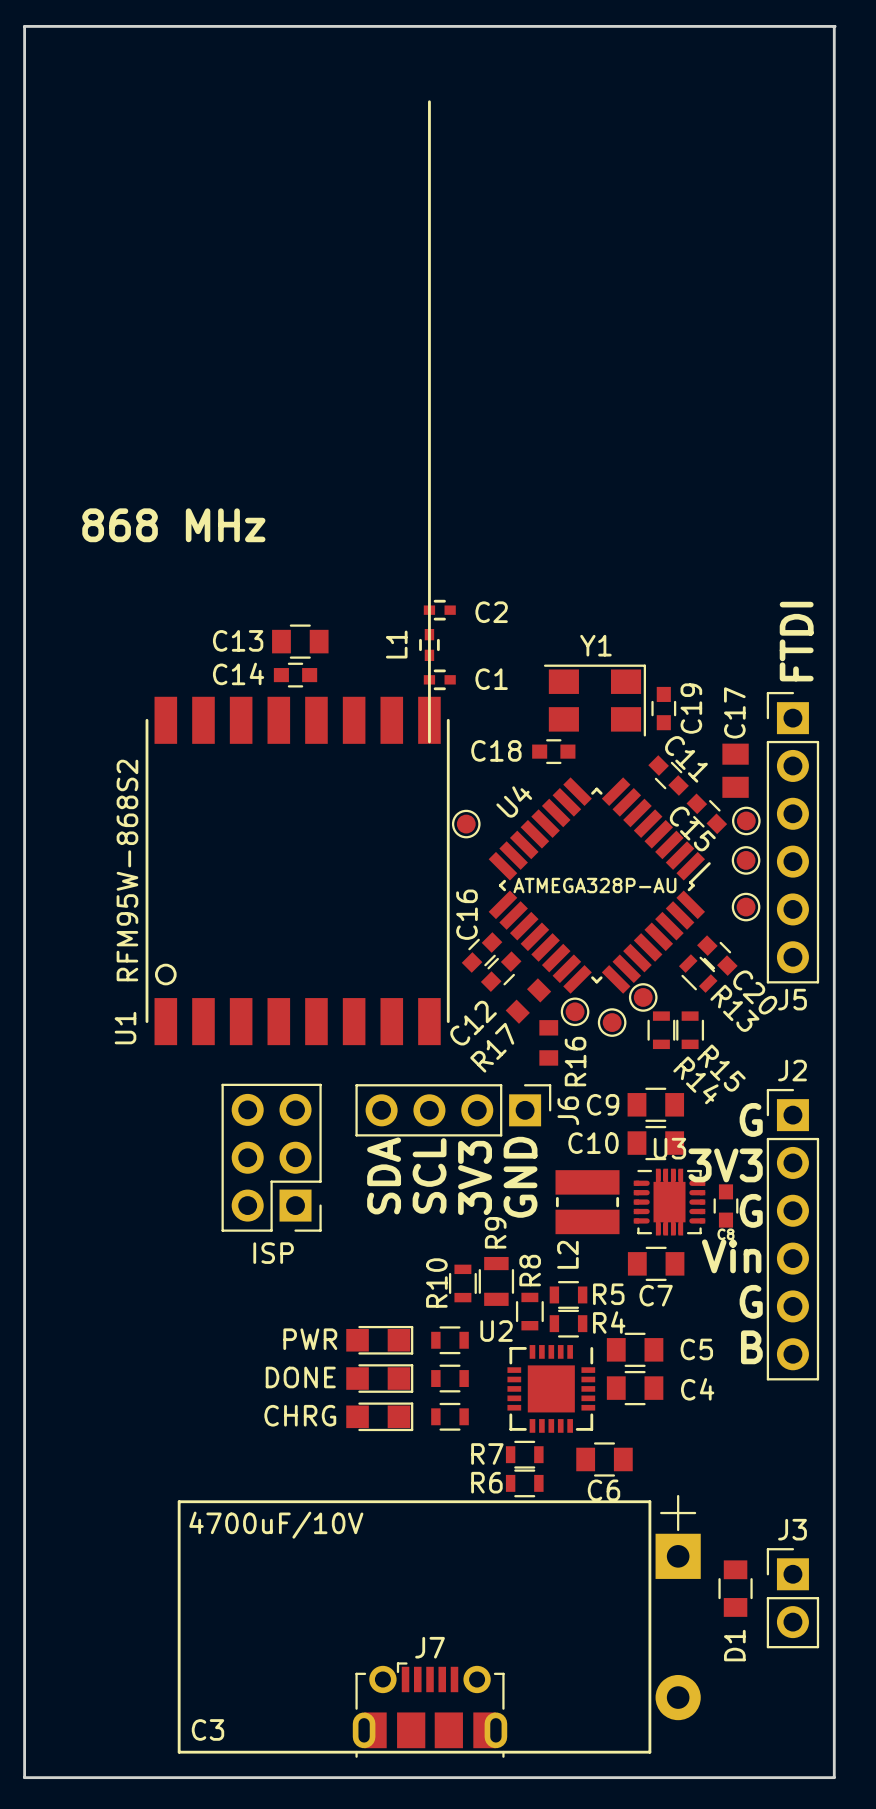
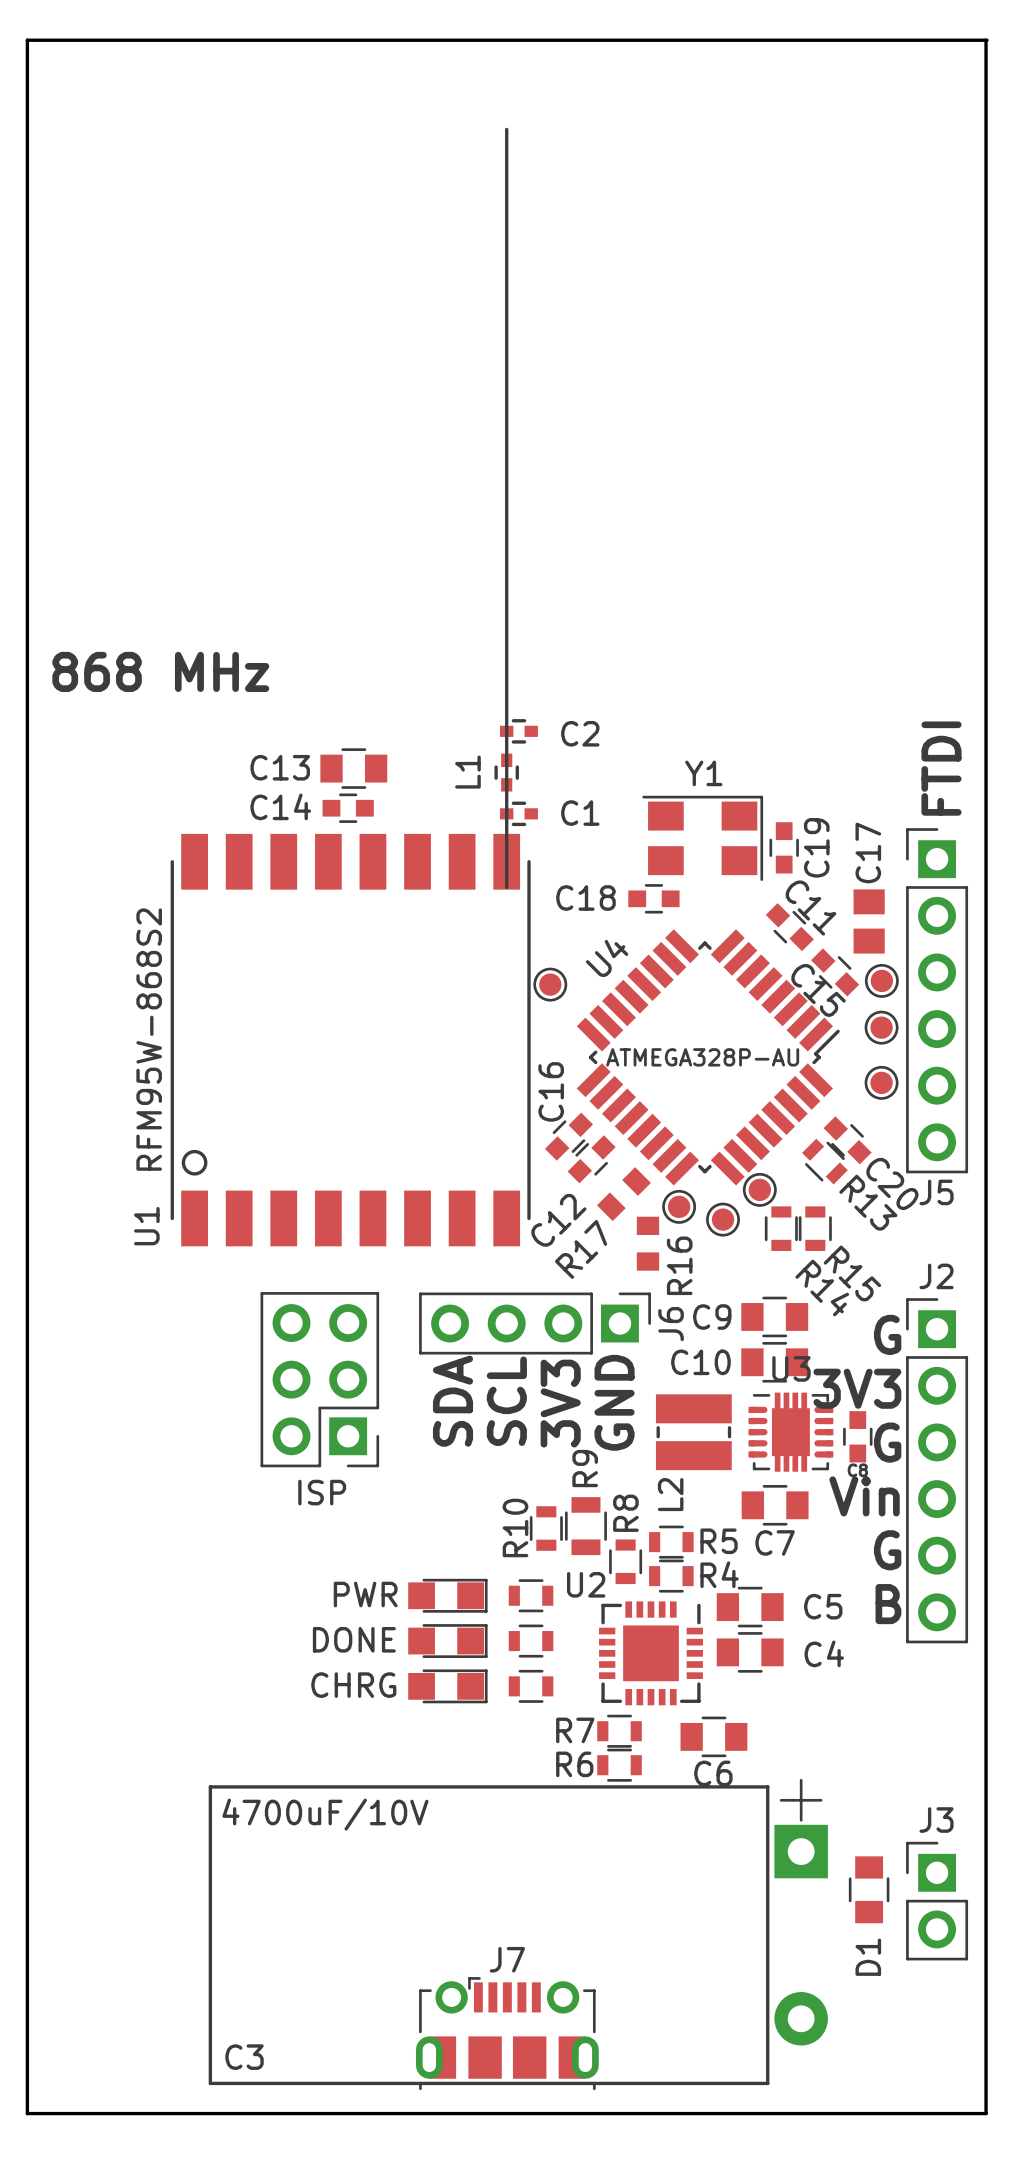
text position: 868 MHz (173, 525) -> 868 MHz (160, 671)

